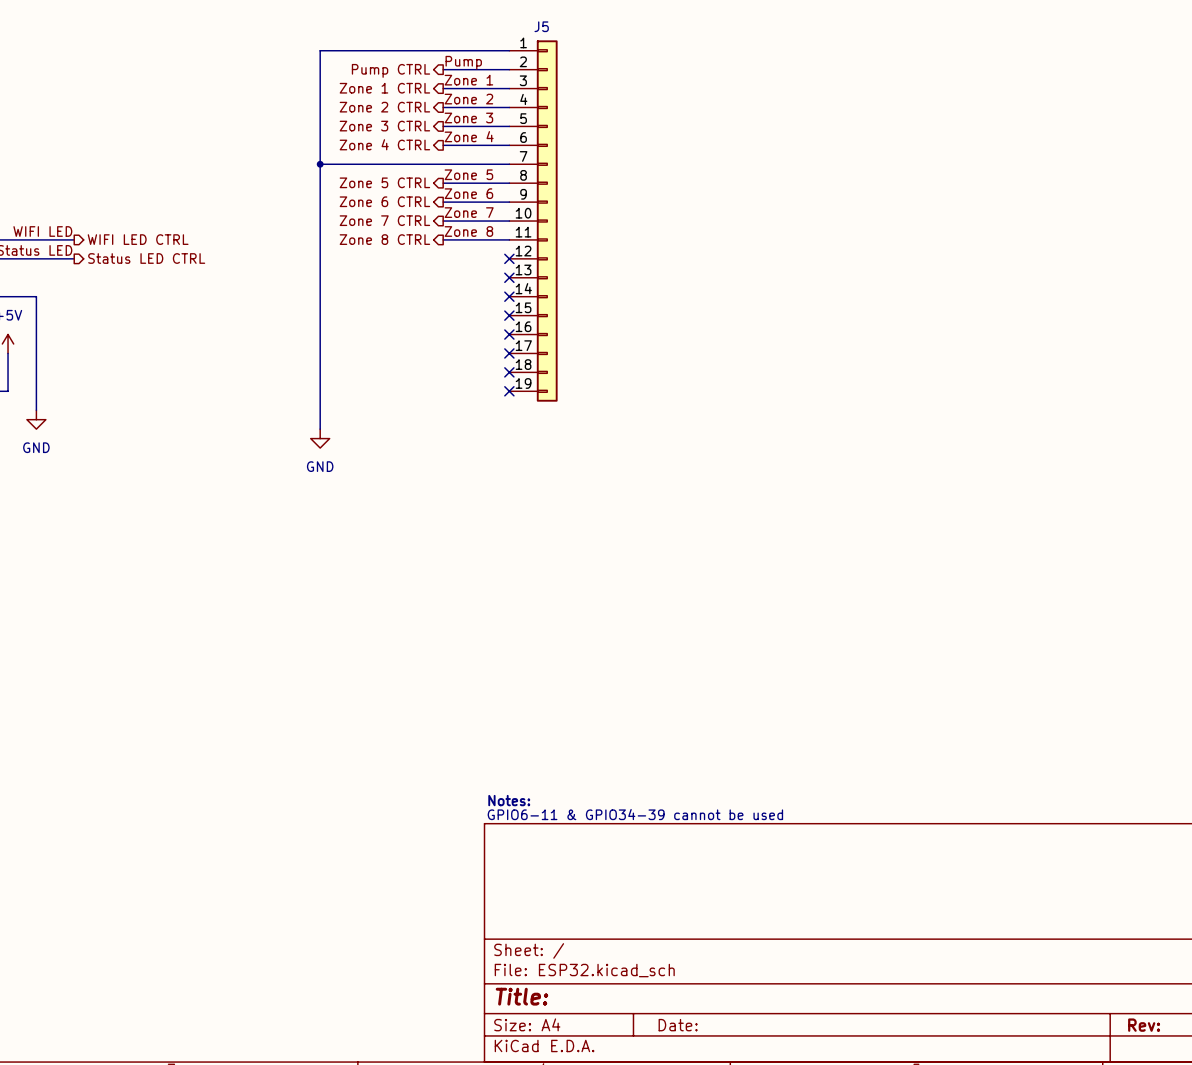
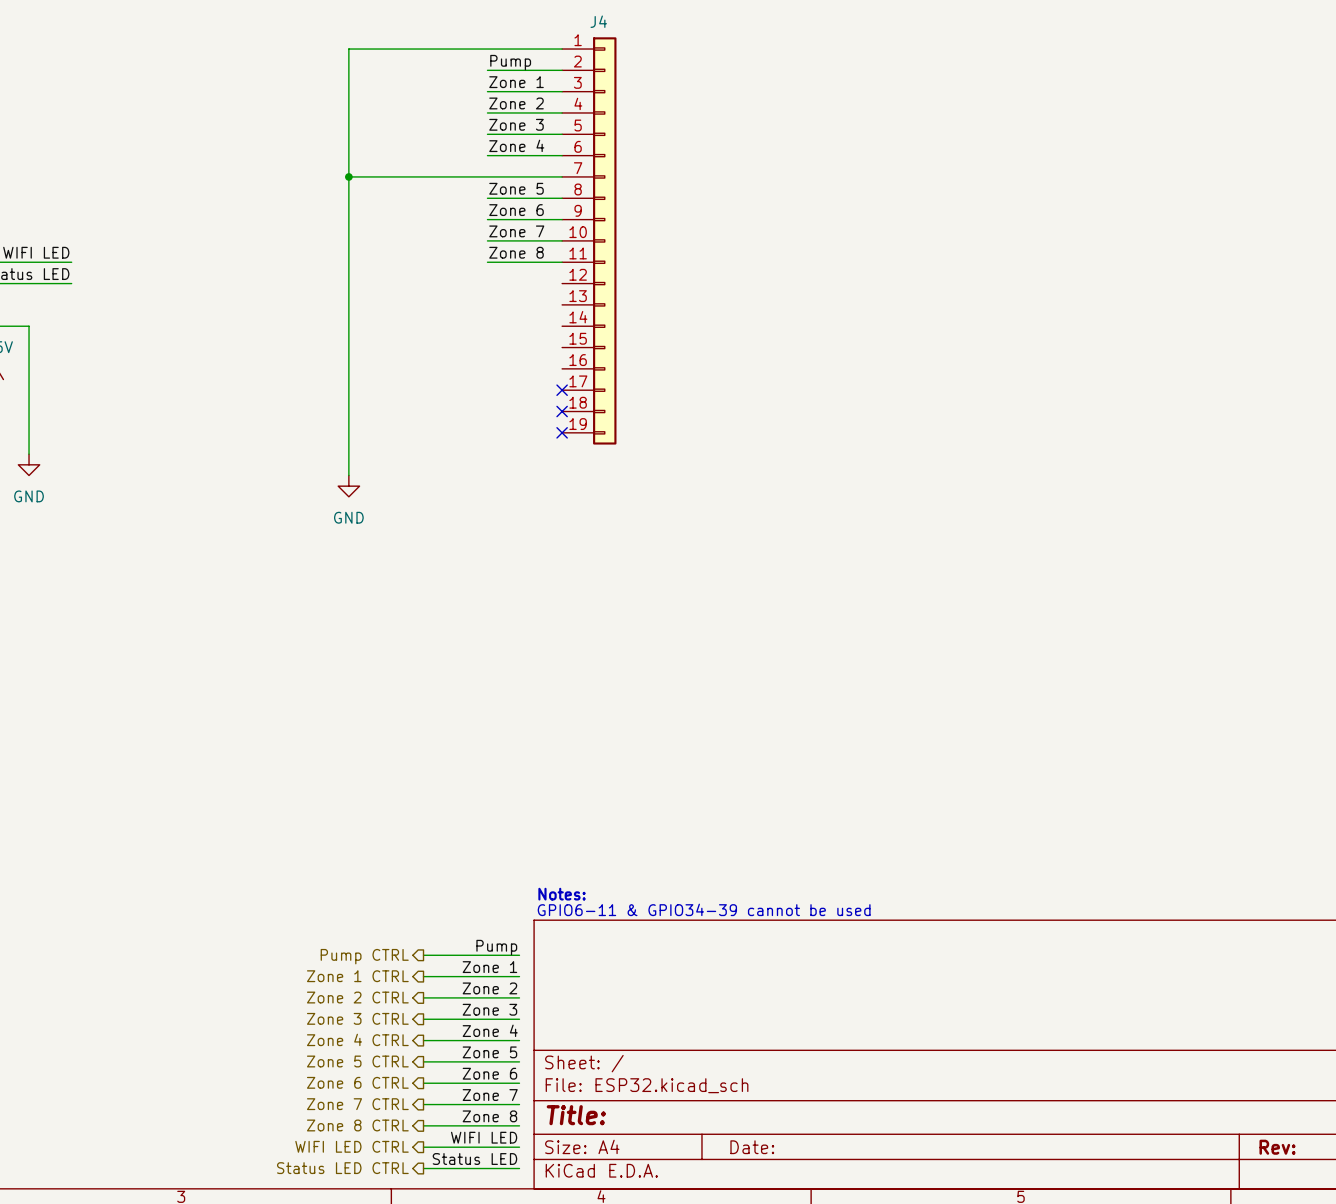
J5 name: J5 (541, 26) -> J4 (598, 21)
hierarchical label: Pump CTRL (390, 70) -> none
hierarchical label: Zone 1 CTRL (384, 88) -> none
hierarchical label: Zone 2 CTRL (384, 107) -> none
hierarchical label: Zone 3 CTRL (384, 126) -> none
hierarchical label: Zone 4 CTRL (384, 144) -> none
hierarchical label: Zone 5 CTRL (384, 182) -> none
hierarchical label: Zone 6 CTRL (384, 201) -> none
hierarchical label: Zone 7 CTRL (384, 220) -> none
hierarchical label: WIFI LED CTRL (138, 239) -> none
hierarchical label: Zone 8 CTRL (384, 239) -> none
hierarchical label: Status LED CTRL (146, 258) -> none
no-connect mark: (509, 258) -> none
no-connect mark: (509, 277) -> none
no-connect mark: (509, 296) -> none
no-connect mark: (509, 315) -> none
no-connect mark: (509, 334) -> none
label: none -> Pump (496, 947)
wire: none -> (423, 955) (519, 955)
hierarchical label: none -> Pump CTRL (364, 956)
label: none -> Zone 1 (489, 967)
hierarchical label: none -> Zone 1 CTRL (357, 976)
wire: none -> (423, 976) (519, 976)
label: none -> Zone 2 (489, 988)
hierarchical label: none -> Zone 2 CTRL (357, 997)
wire: none -> (423, 997) (519, 997)
label: none -> Zone 3 (489, 1009)
hierarchical label: none -> Zone 3 CTRL (357, 1018)
wire: none -> (423, 1019) (519, 1019)
label: none -> Zone 4 (490, 1030)
hierarchical label: none -> Zone 4 CTRL (357, 1039)
wire: none -> (423, 1040) (519, 1040)
label: none -> Zone 5 (489, 1052)
hierarchical label: none -> Zone 5 CTRL (357, 1061)
wire: none -> (423, 1061) (519, 1061)
label: none -> Zone 6 (489, 1073)
hierarchical label: none -> Zone 6 CTRL (357, 1082)
wire: none -> (423, 1083) (519, 1083)
label: none -> Zone 7 (490, 1095)
hierarchical label: none -> Zone 7 CTRL (357, 1104)
wire: none -> (423, 1104) (519, 1104)
label: none -> Zone 8 (489, 1116)
hierarchical label: none -> Zone 8 CTRL (357, 1125)
wire: none -> (423, 1125) (519, 1125)
label: none -> WIFI LED (484, 1137)
hierarchical label: none -> WIFI LED CTRL (352, 1146)
wire: none -> (423, 1147) (519, 1147)
label: none -> Status LED (474, 1159)
hierarchical label: none -> Status LED CTRL (342, 1168)
wire: none -> (423, 1168) (519, 1168)

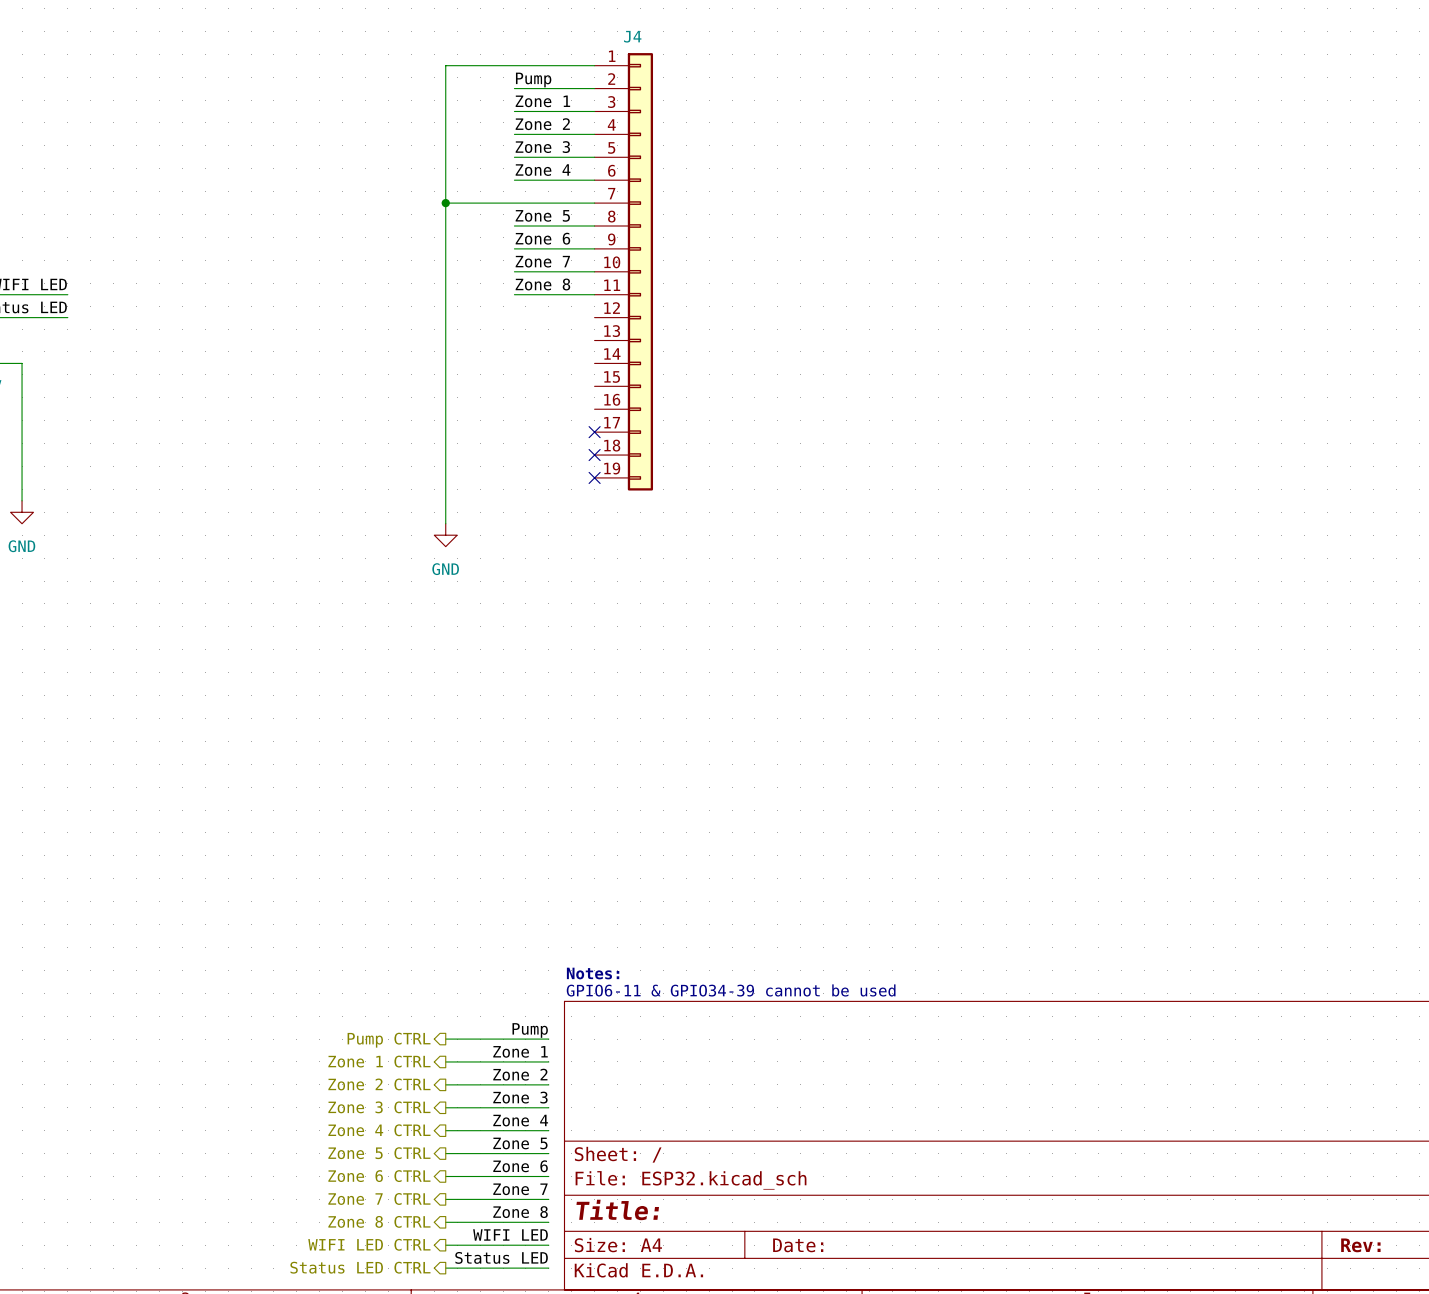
wire: (423, 49) (348, 49) (348, 475) -> (445, 65) (445, 523)
wire: (348, 176) (423, 176) -> none
junction: (348, 176) -> none
junction: none -> (445, 203)
power symbol position: GND (348, 486) -> GND (445, 535)

